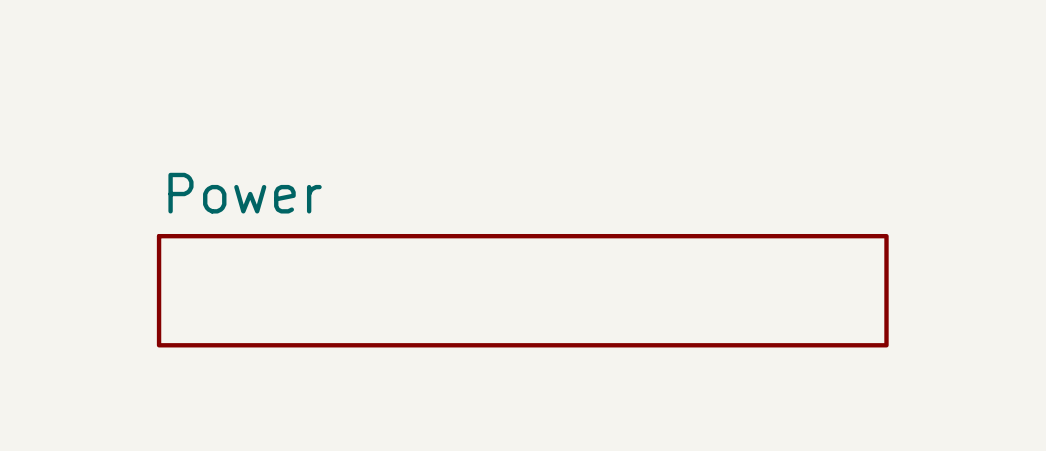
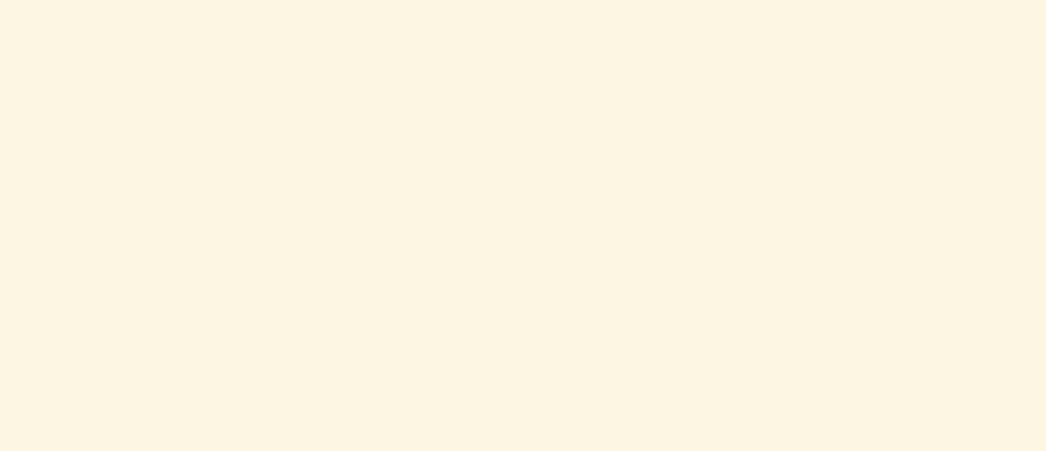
sheet Power: (522, 290) -> none

